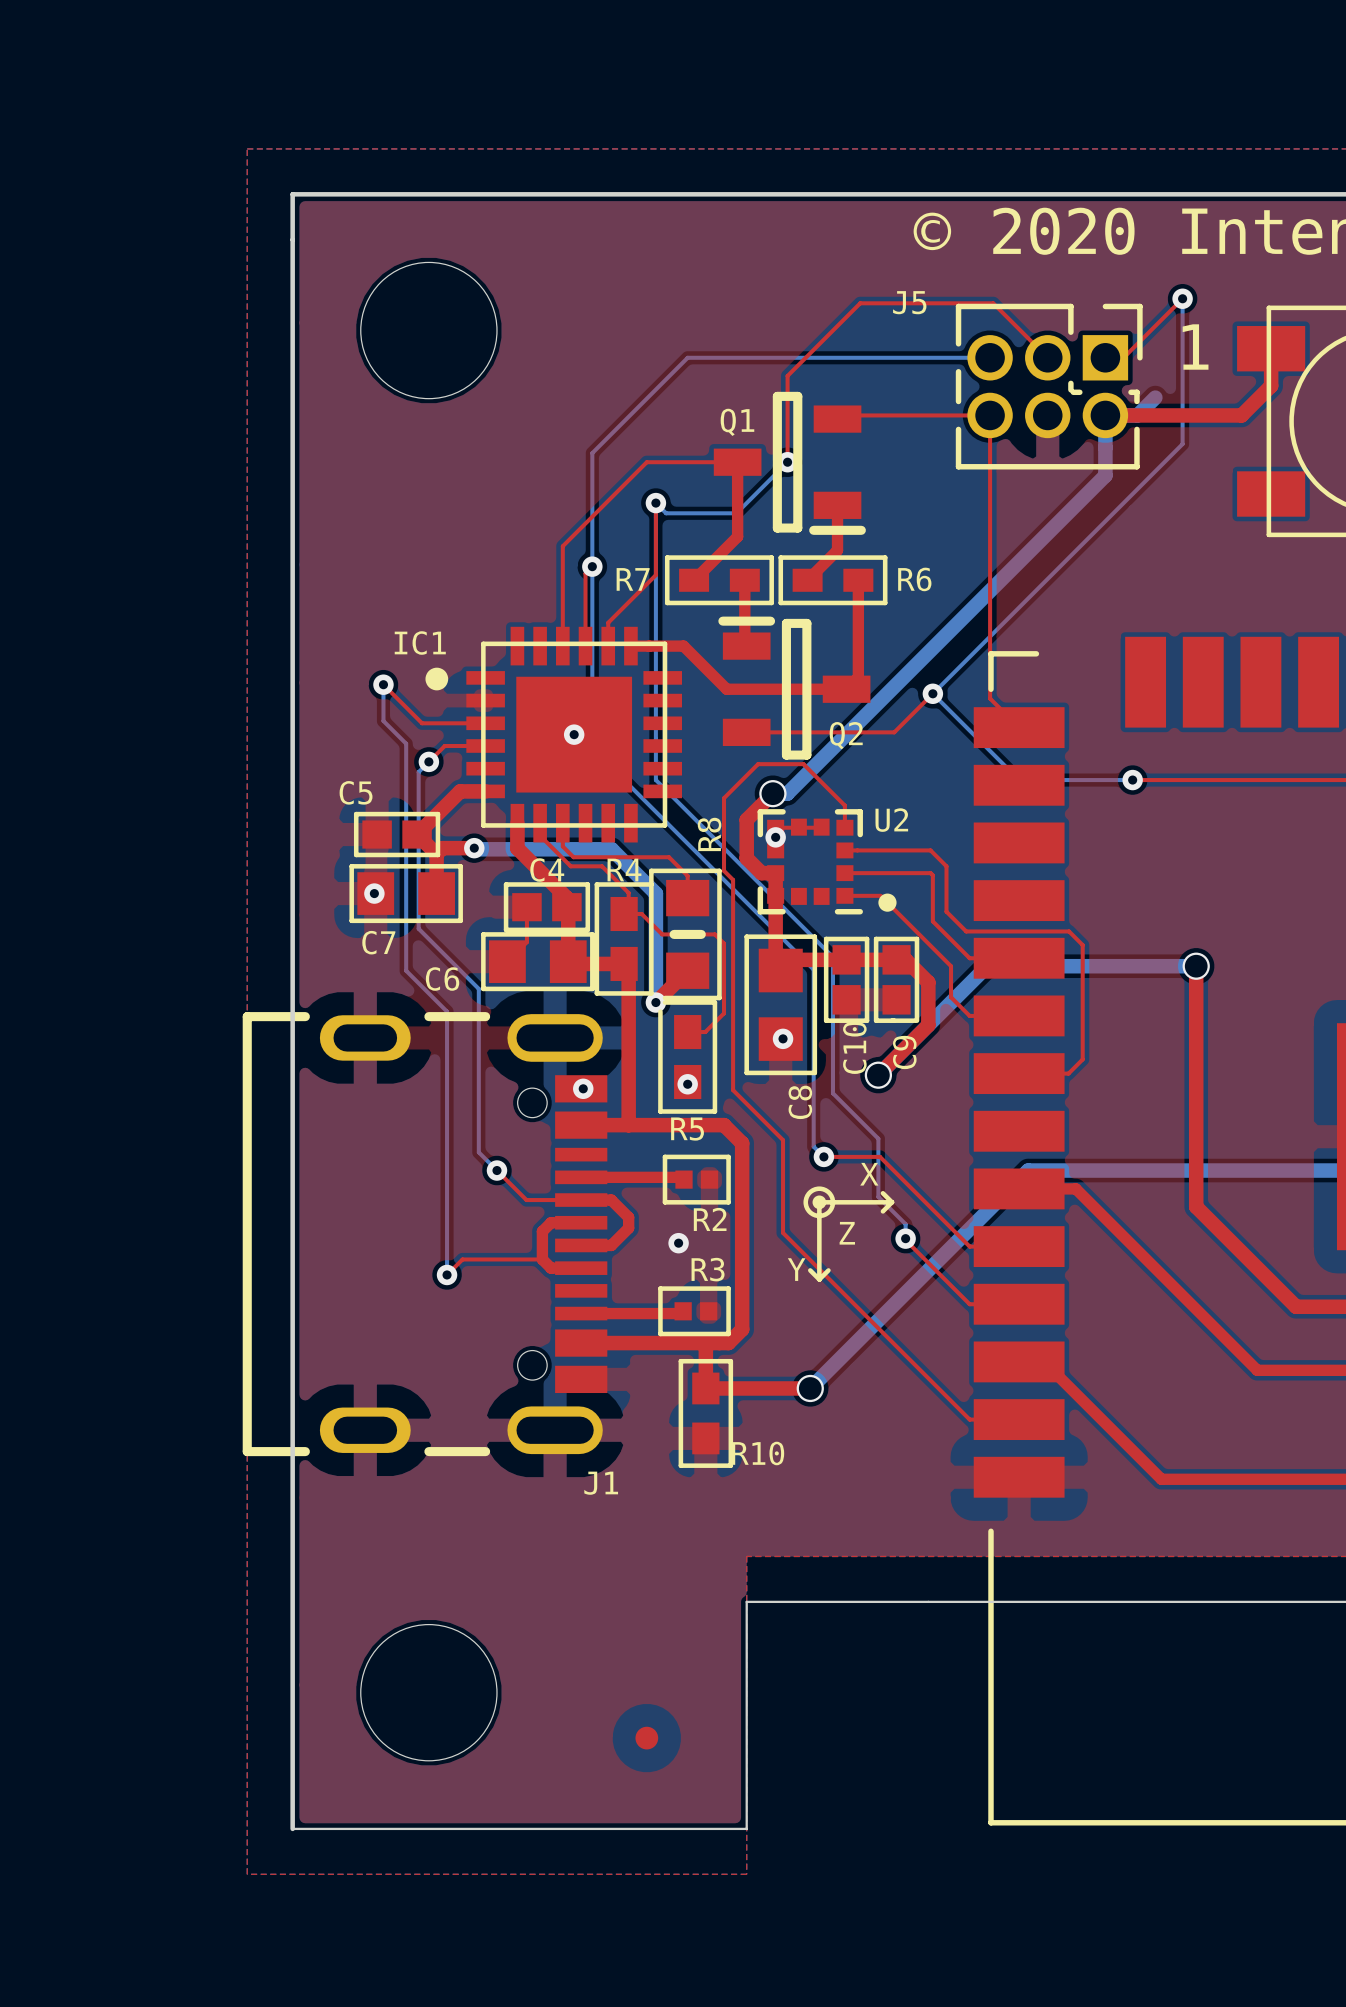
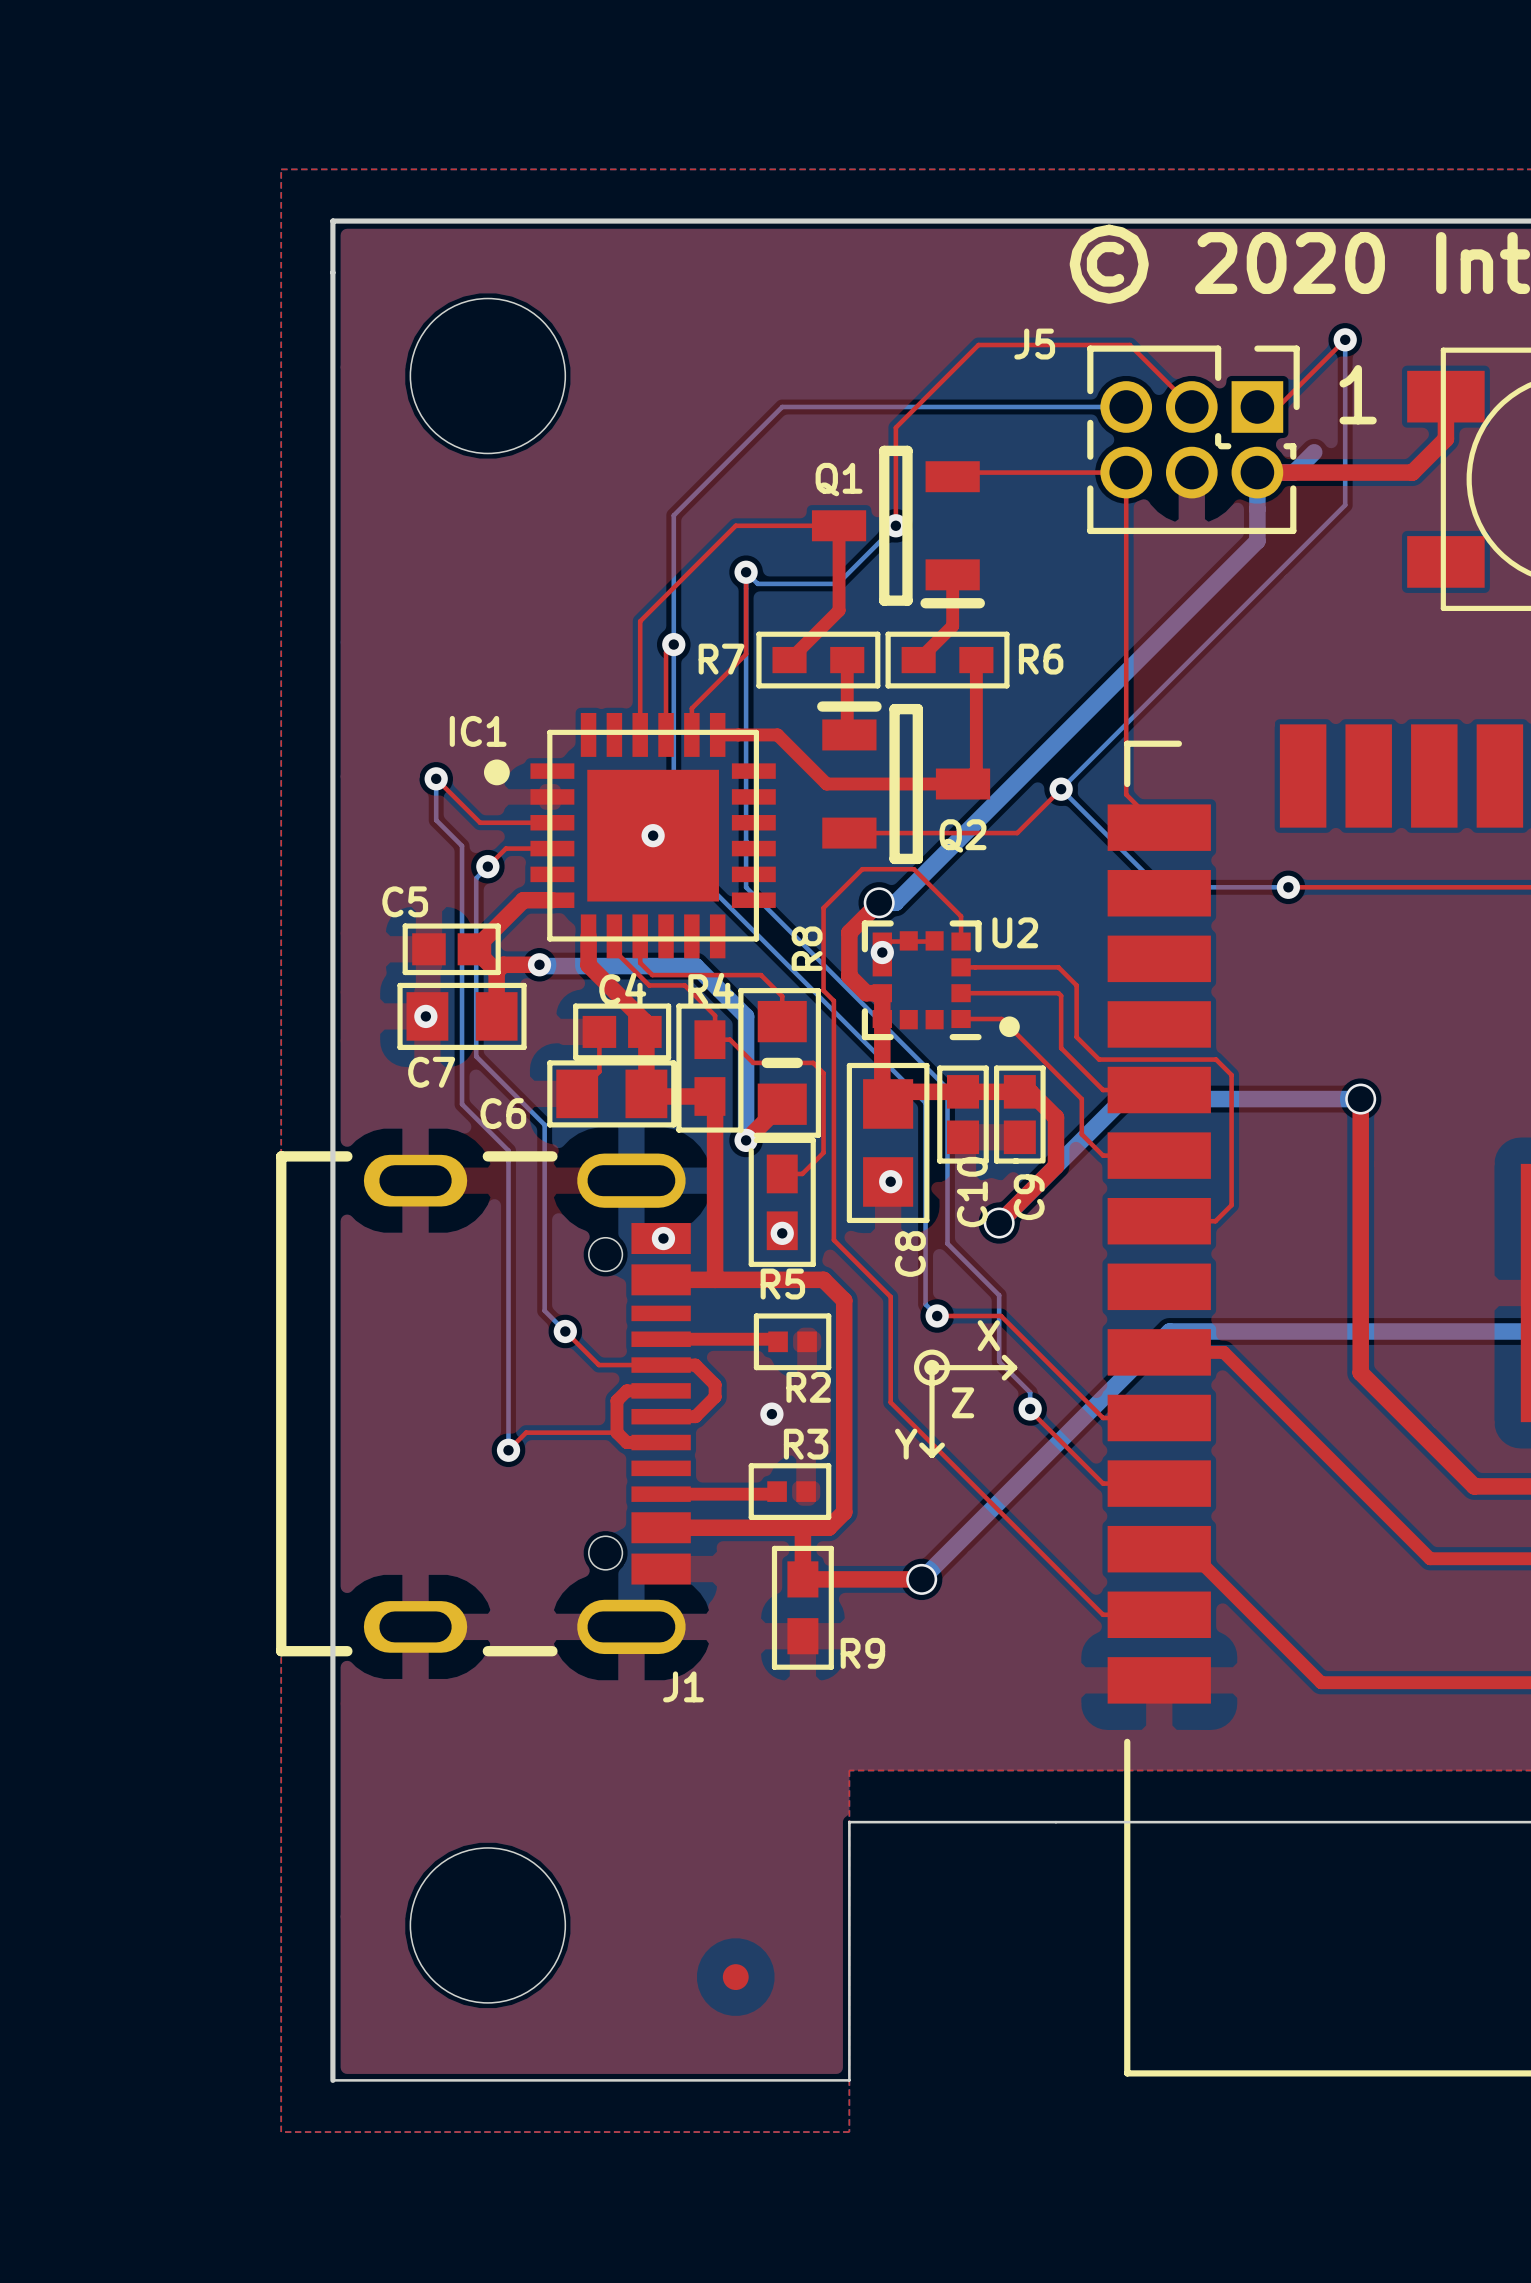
R10 name: R10 (758, 1453) -> R9 (862, 1653)

